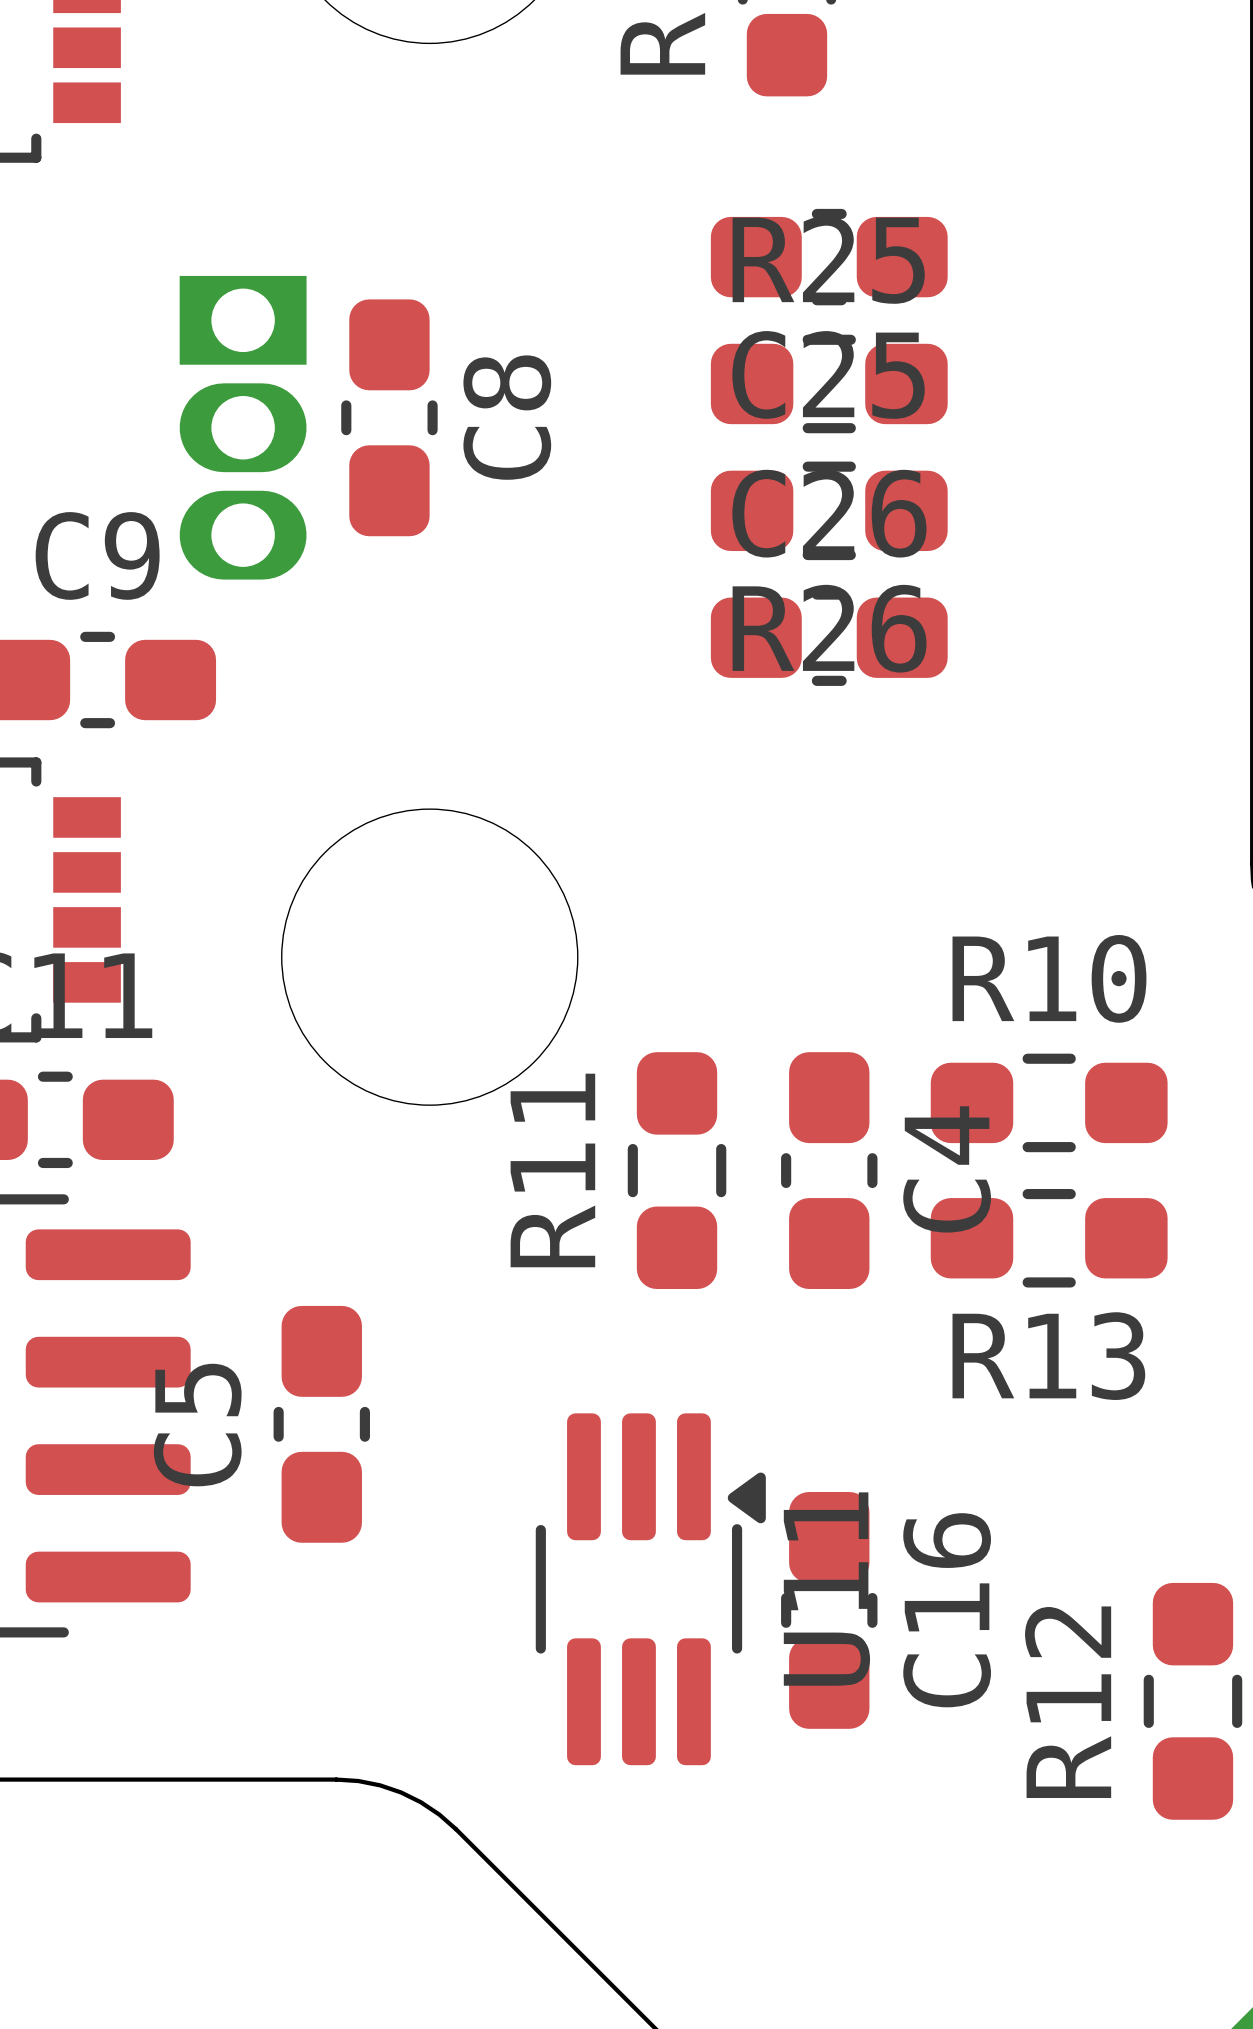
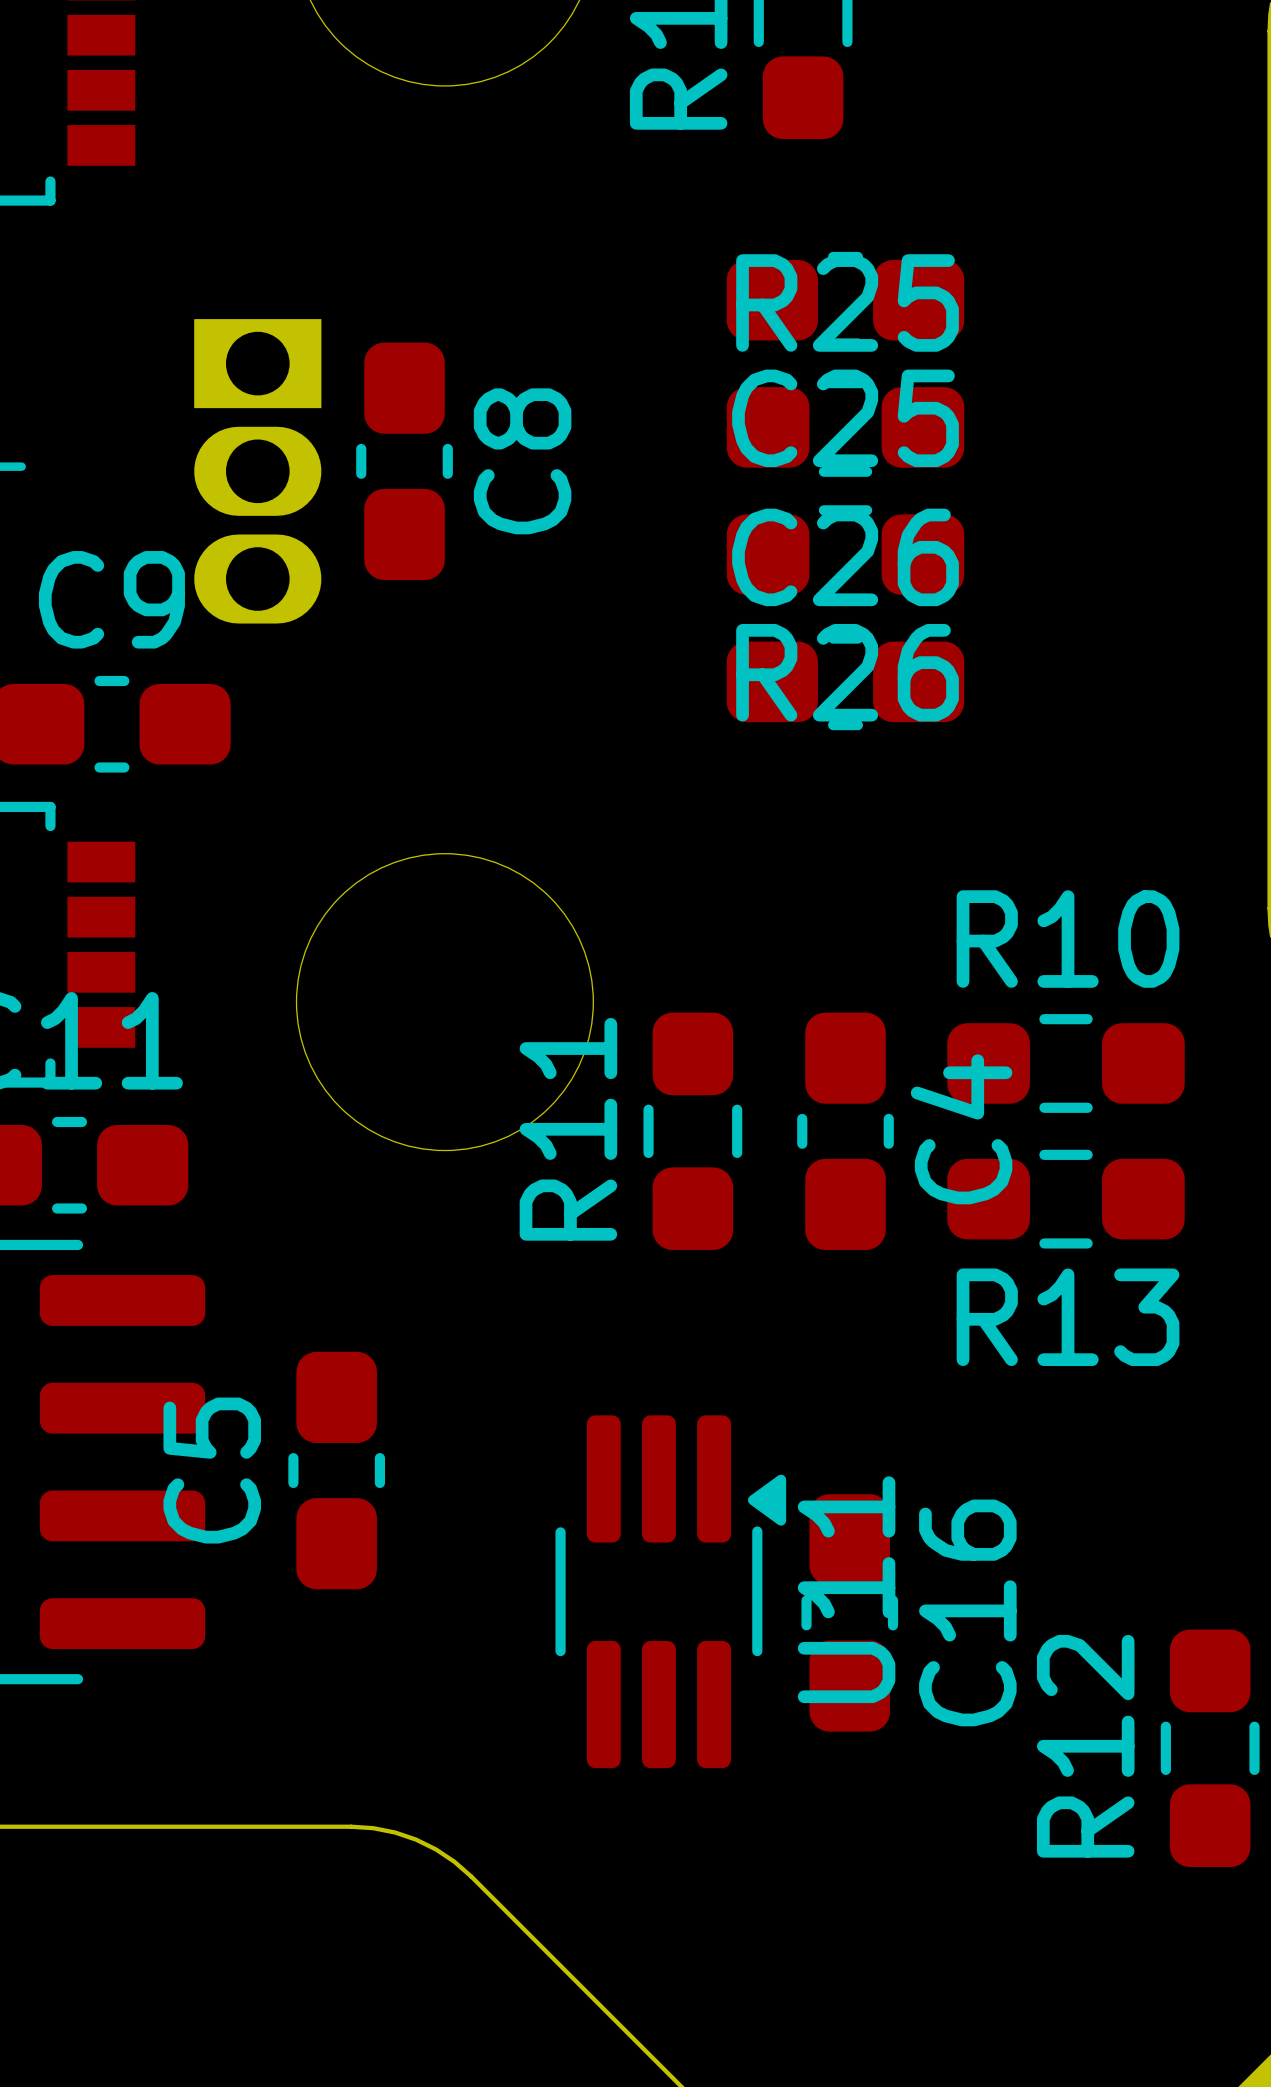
R10 position: (1049, 1102) -> (1066, 1063)
R11 position: (677, 1170) -> (692, 1131)
C4 position: (829, 1170) -> (845, 1131)
R13 position: (1049, 1238) -> (1066, 1199)
U11 position: (650, 1589) -> (670, 1591)
C16 position: (829, 1610) -> (849, 1612)

